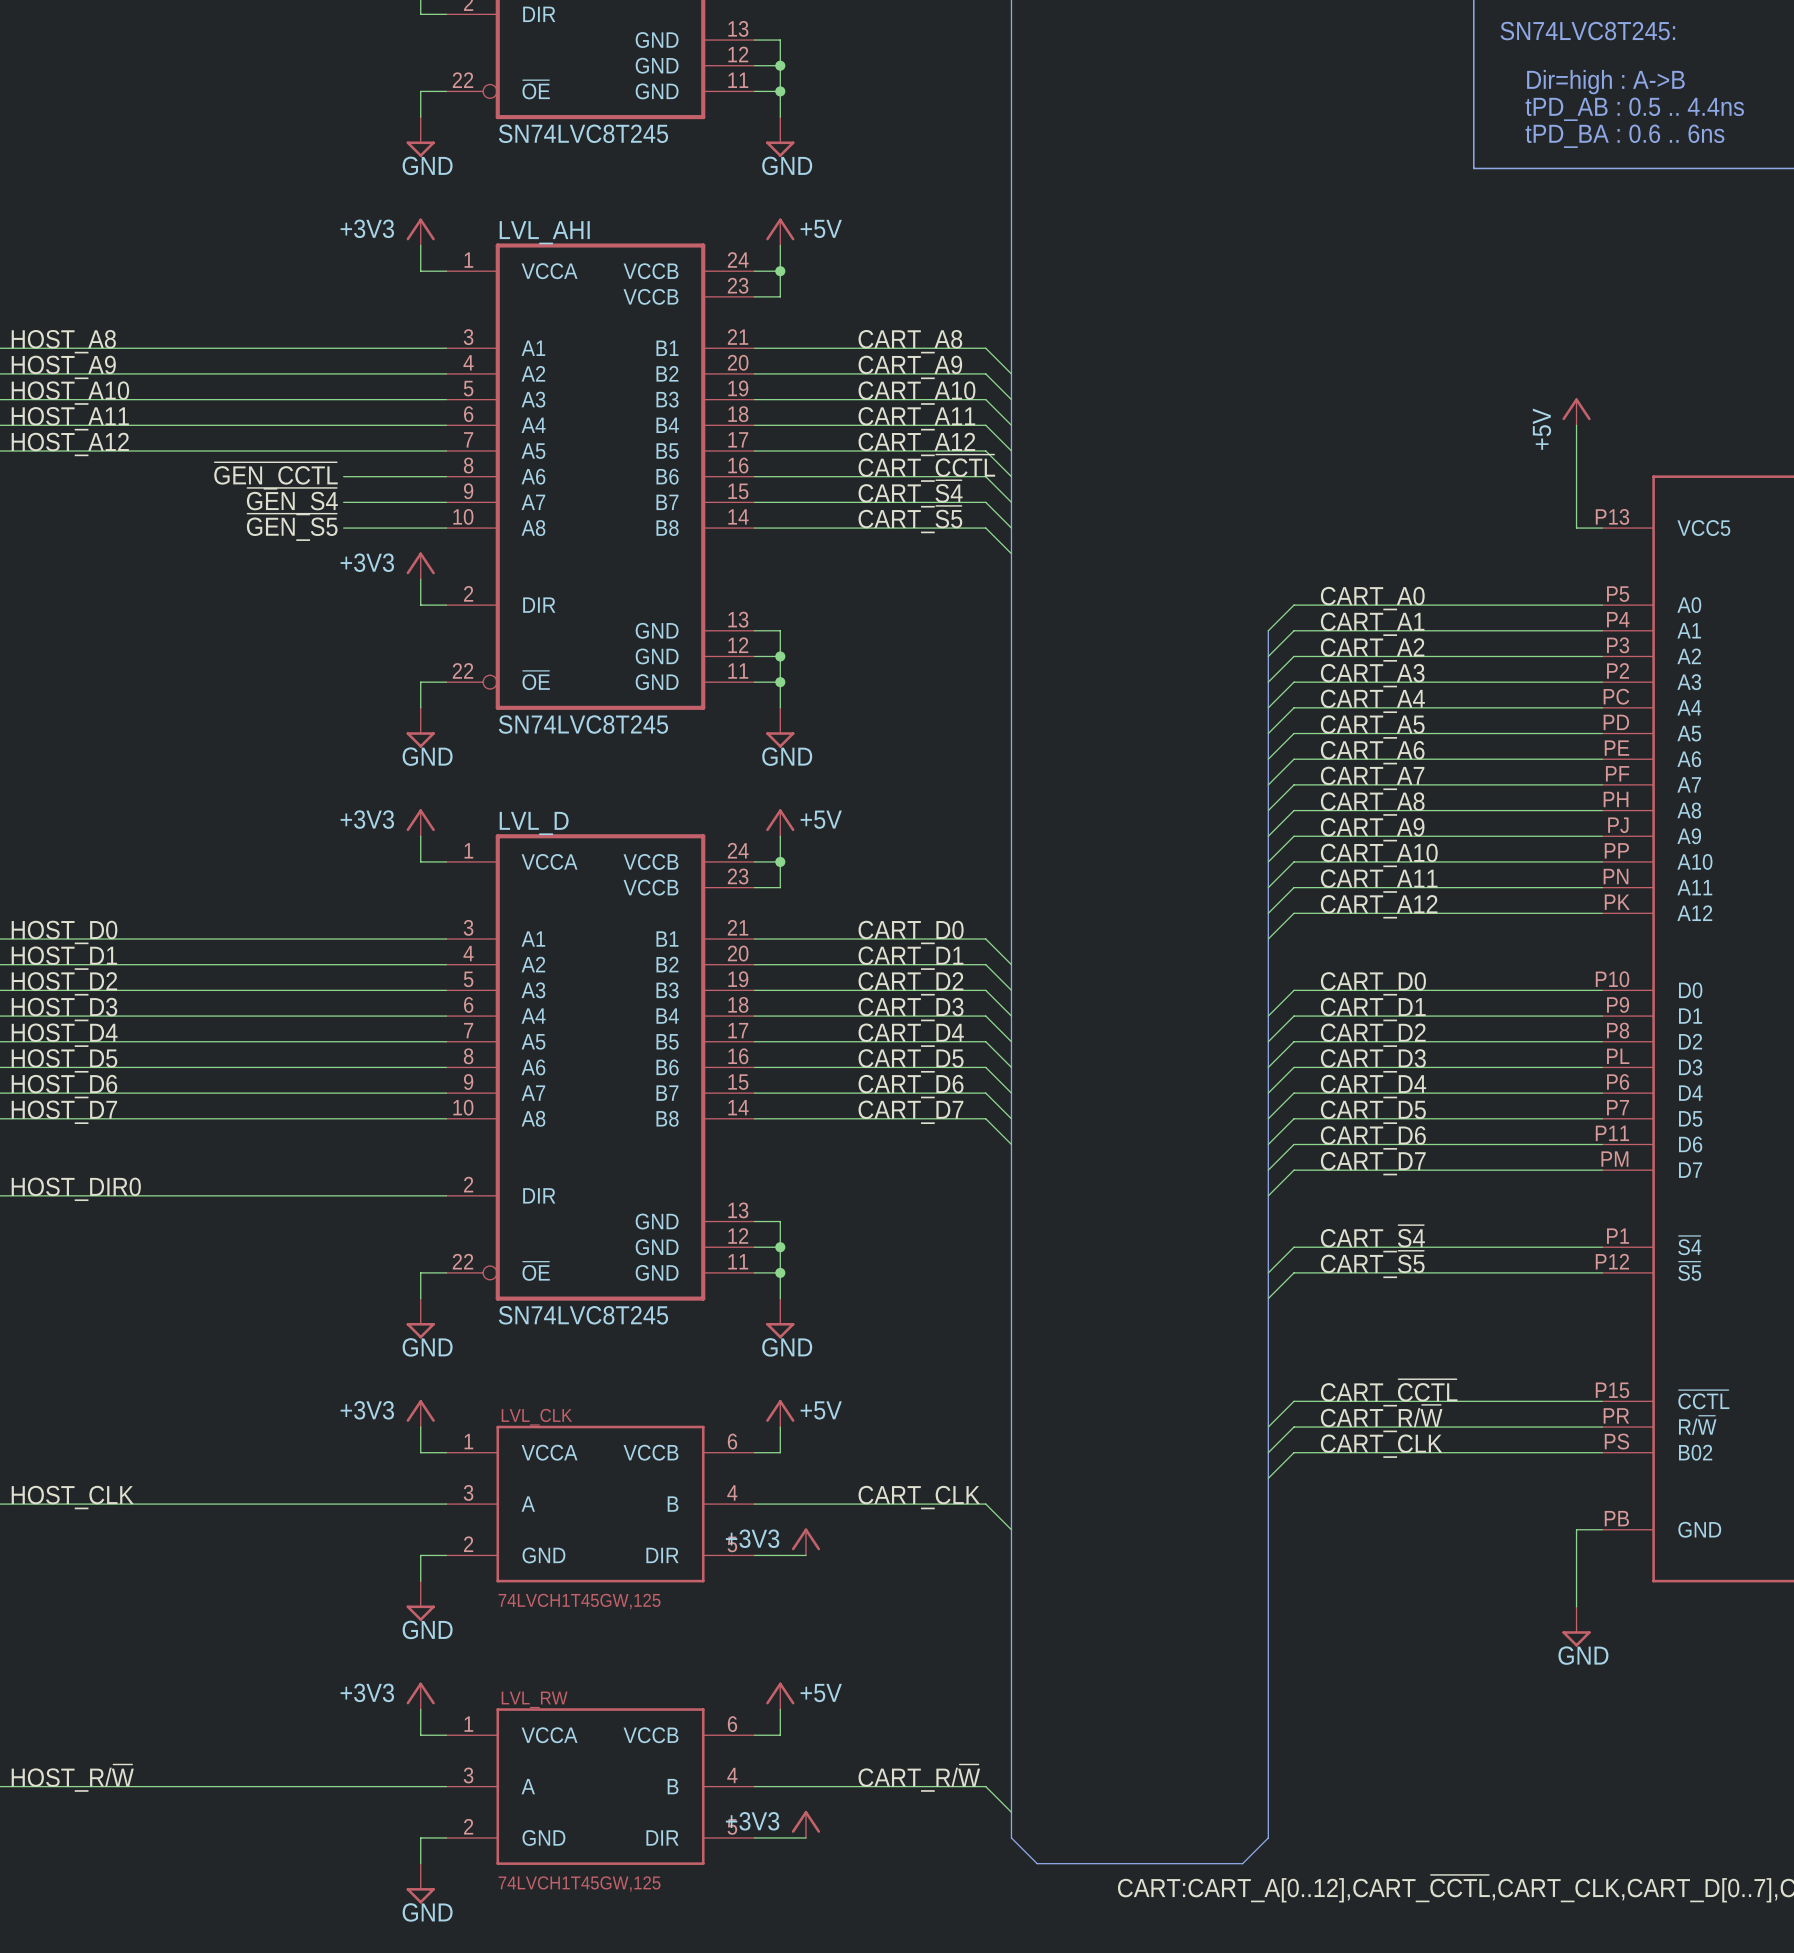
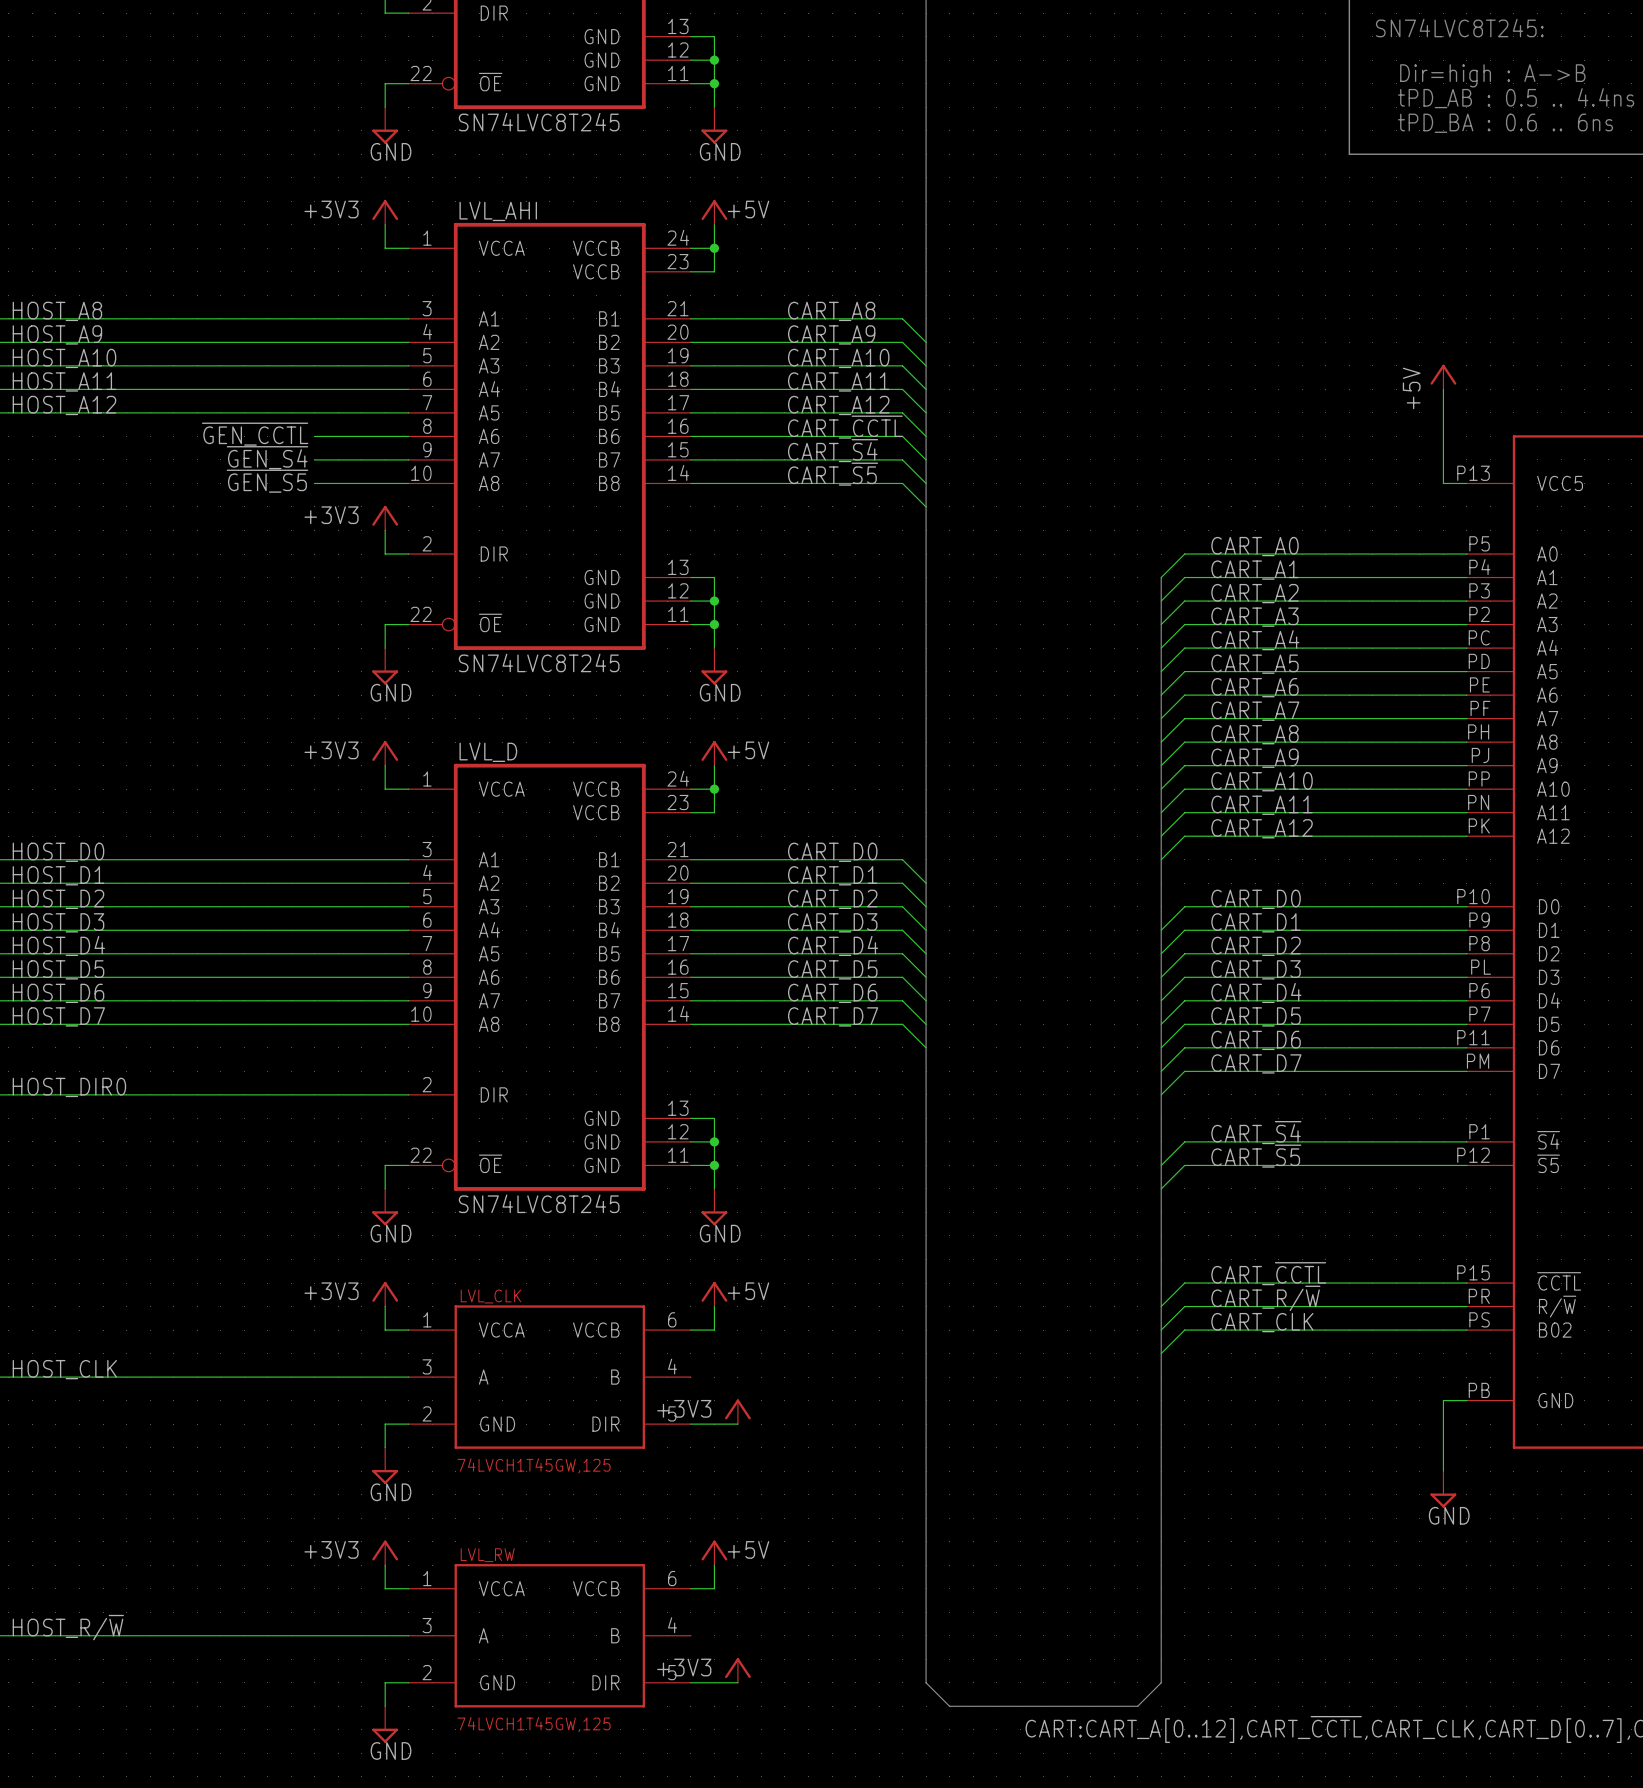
label: CART_CLK (919, 1497) -> none
wire: (754, 1504) (985, 1504) (1011, 1529) -> none
label: CART_R/~{W} (919, 1778) -> none
wire: (754, 1786) (985, 1786) (1011, 1812) -> none

